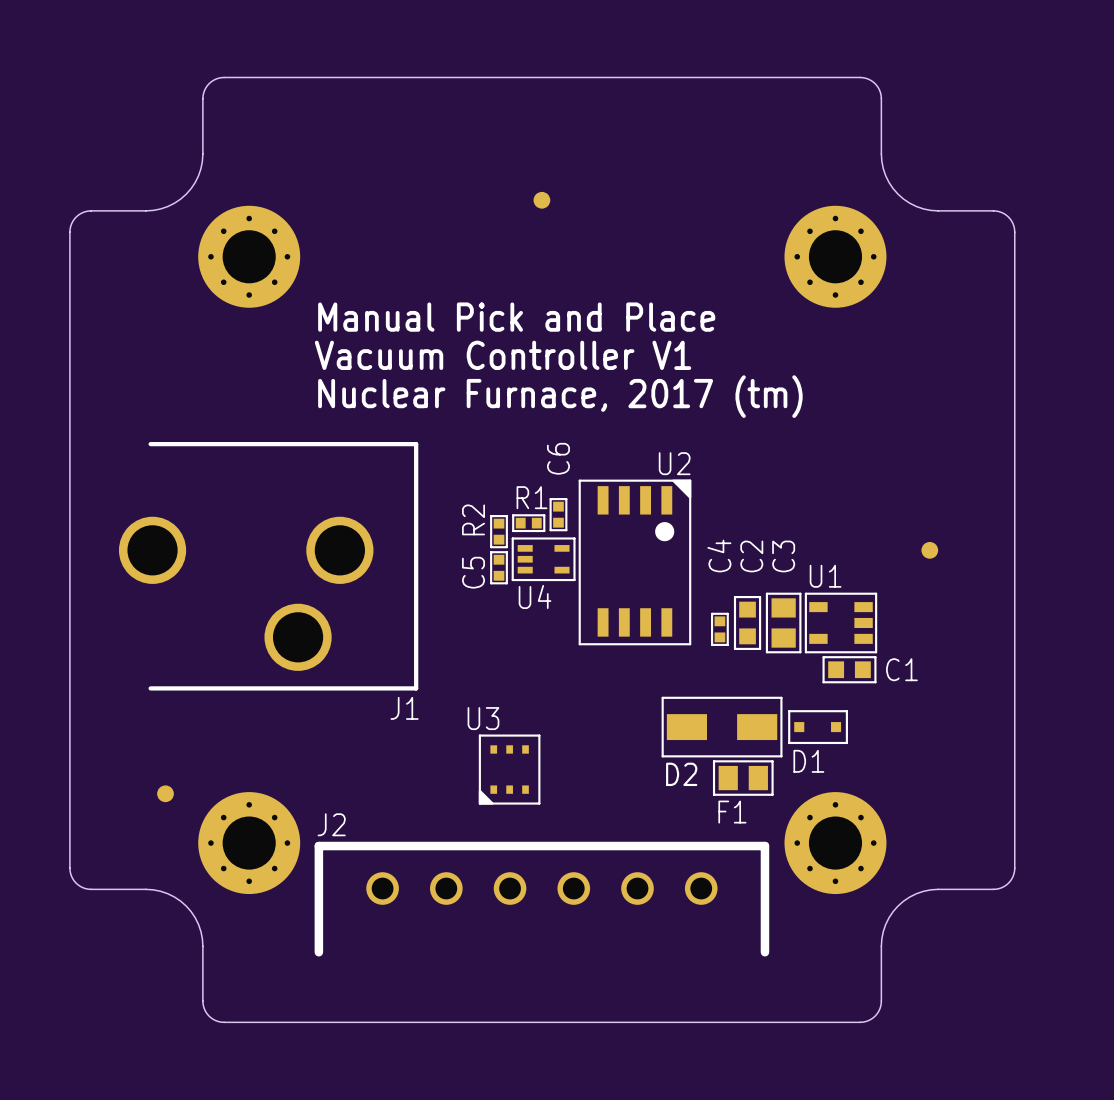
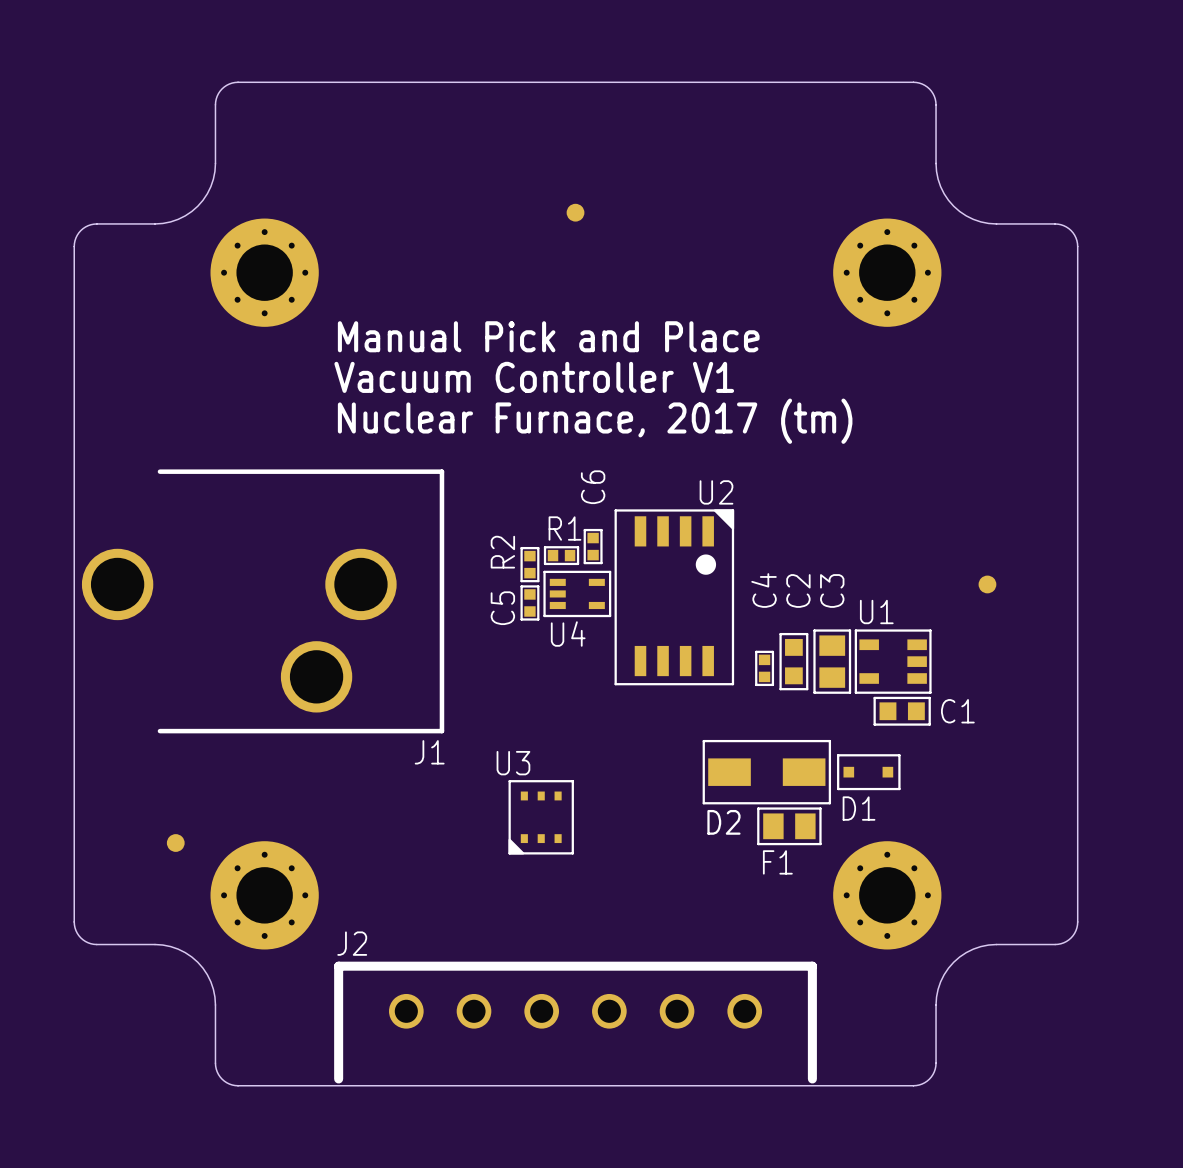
J1 footprint: [118, 442, 419, 691] -> [81, 469, 445, 734]
J2 position: (541, 899) -> (575, 1022)

